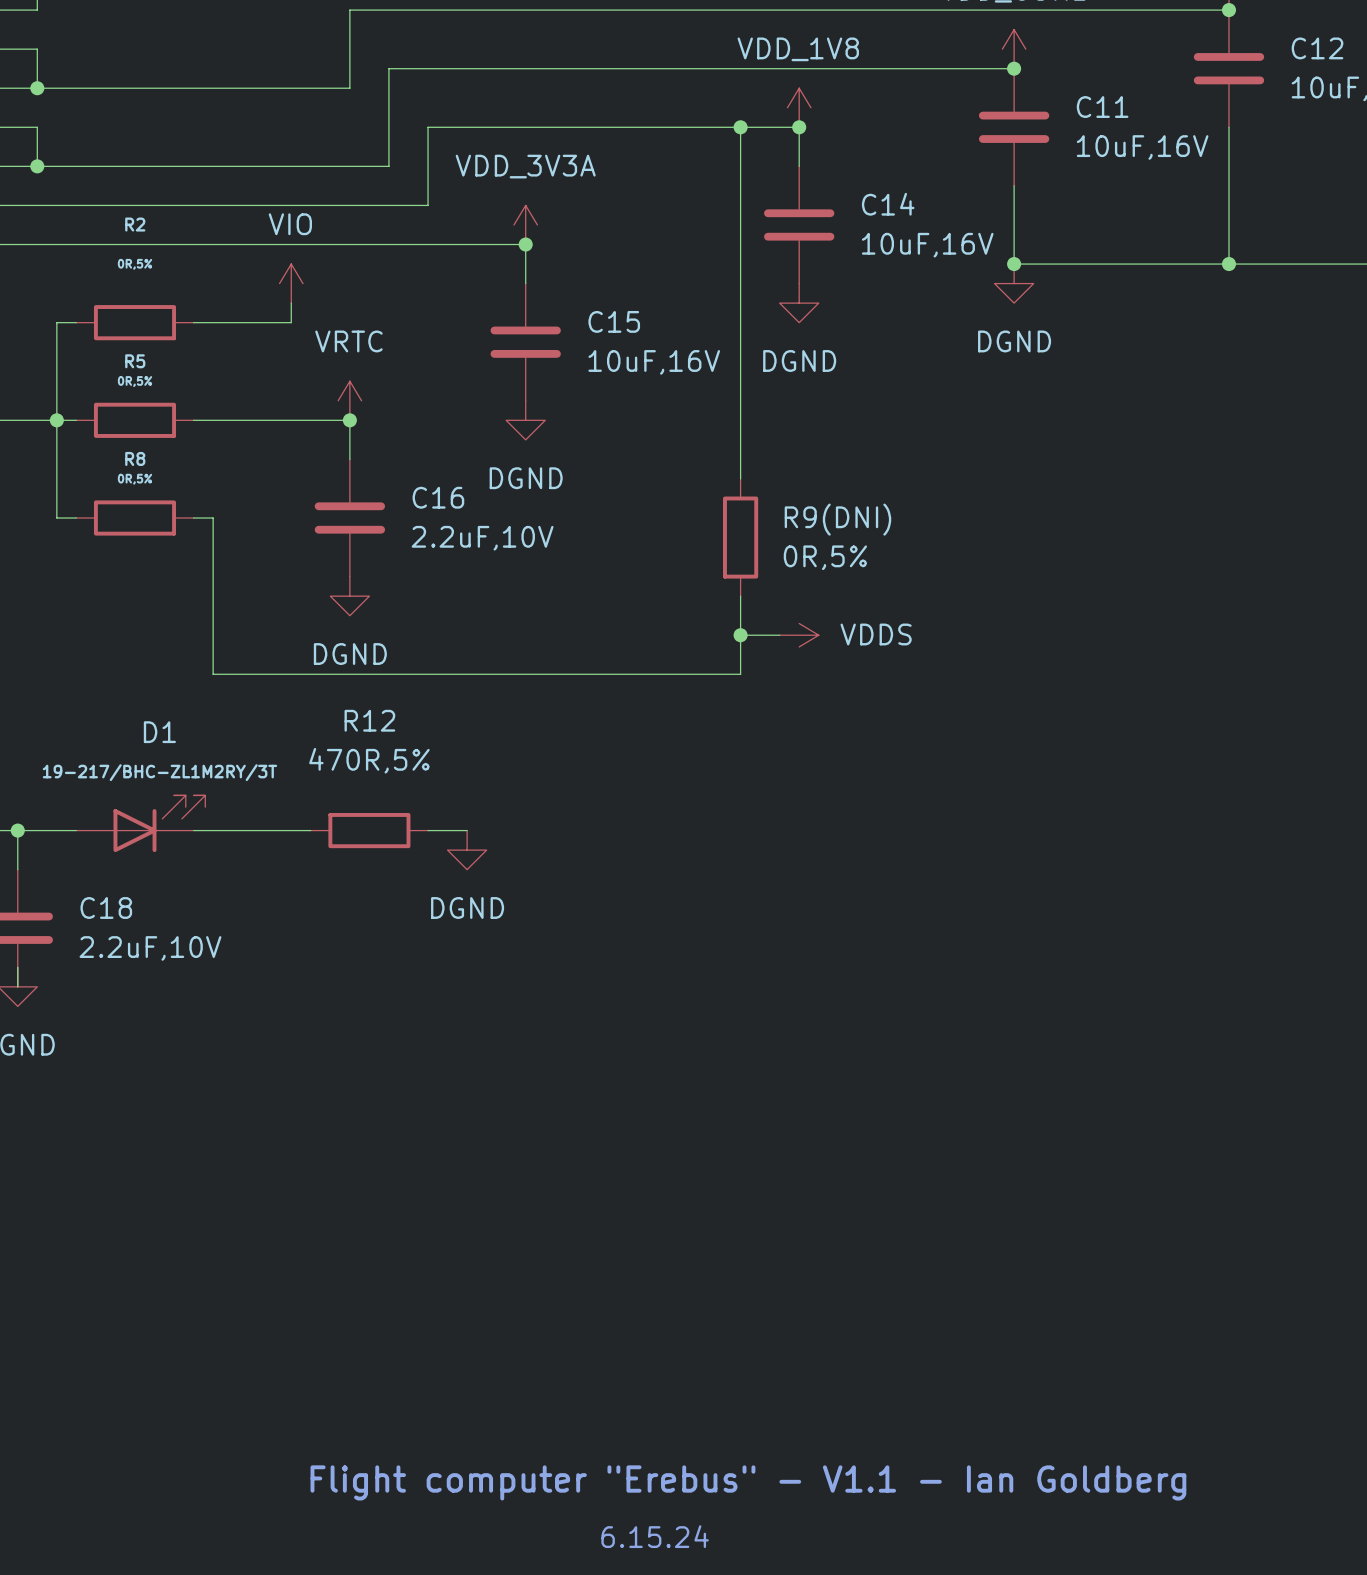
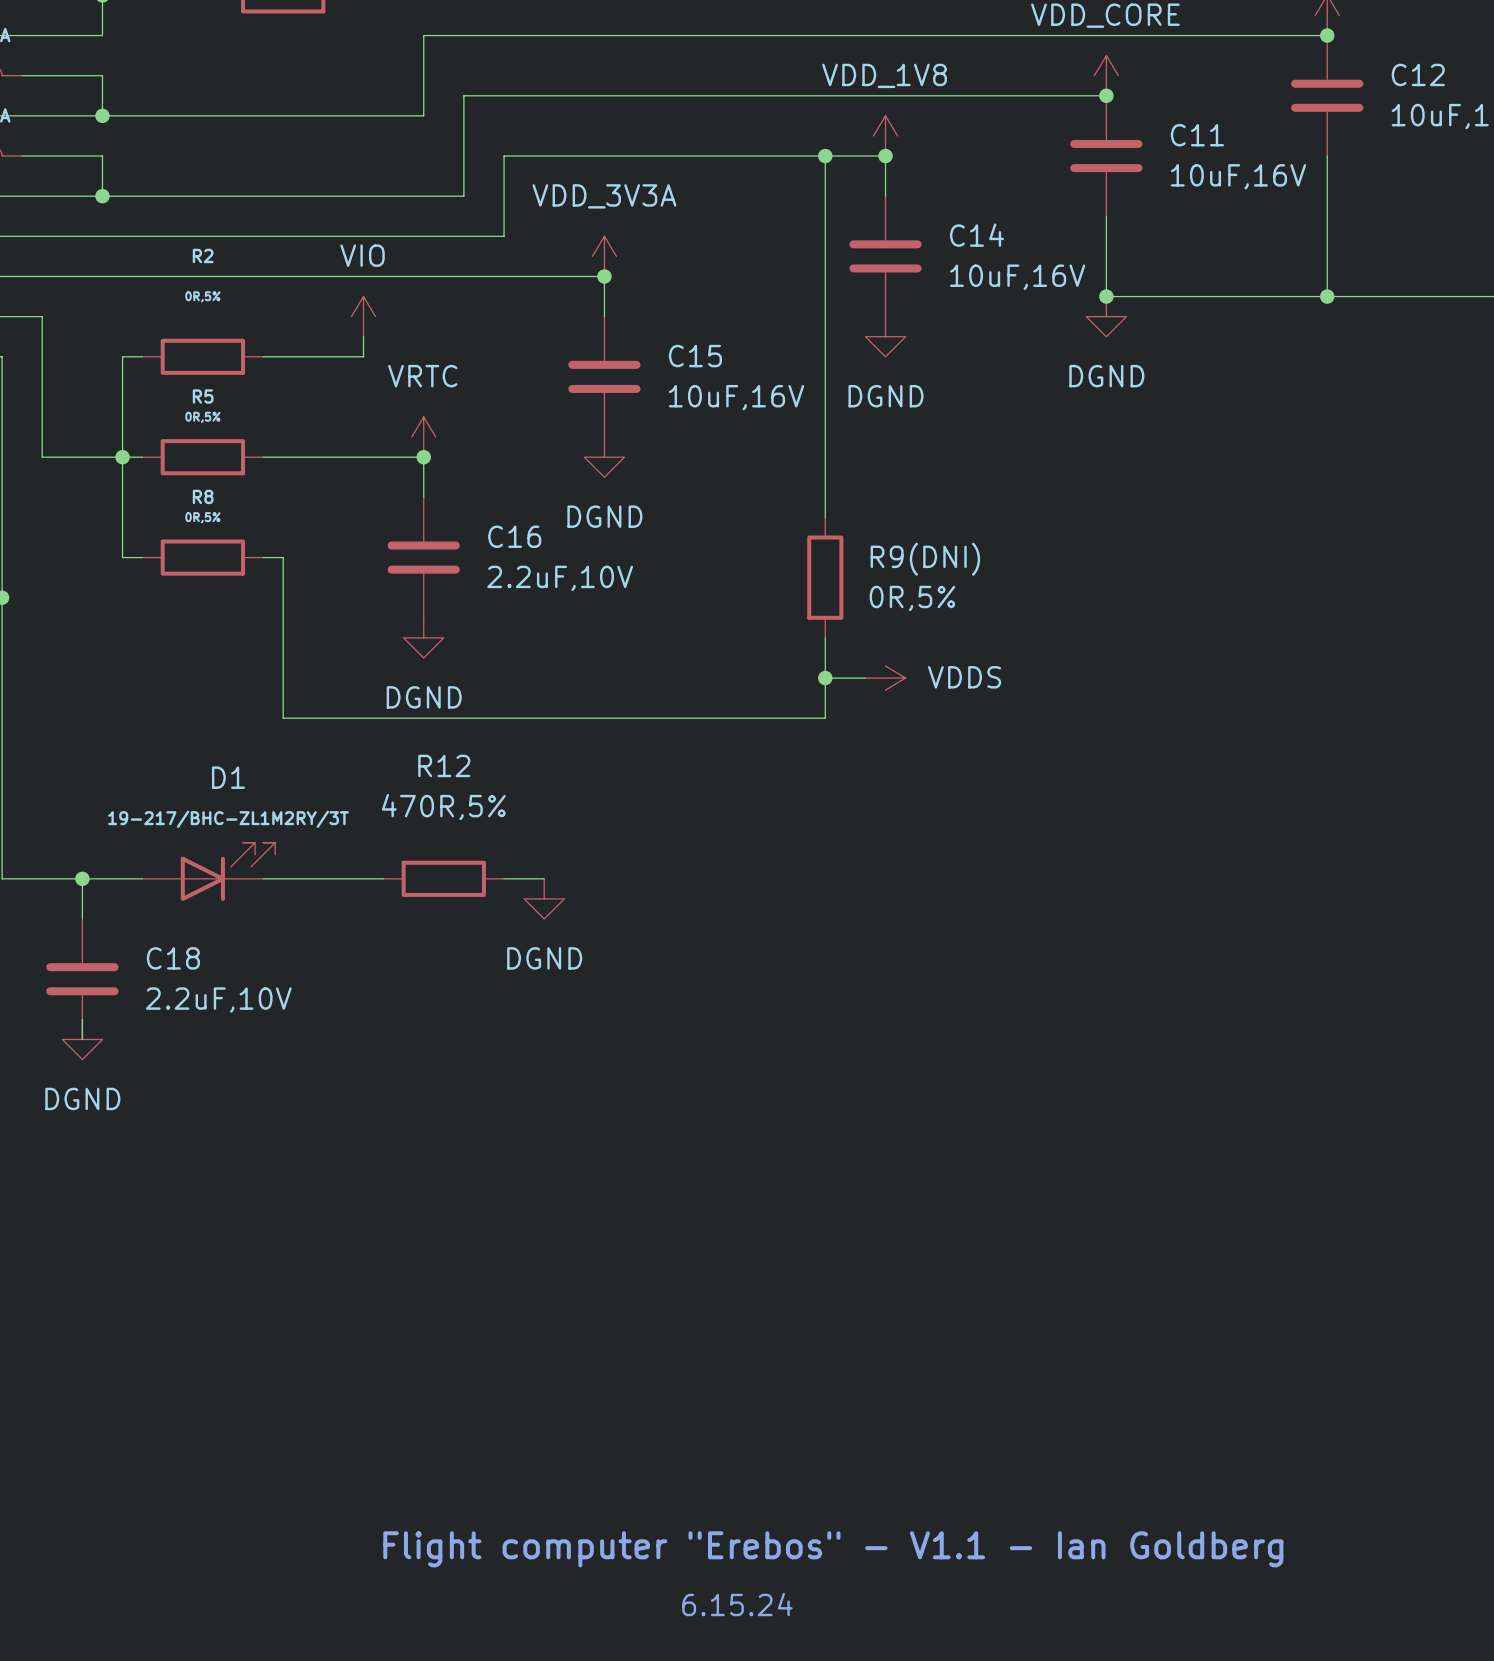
text: Flight computer "Erebus" - V1.1 - Ian Goldberg (748, 1482) -> Flight computer "Erebos" - V1.1 - Ian Goldberg (833, 1549)

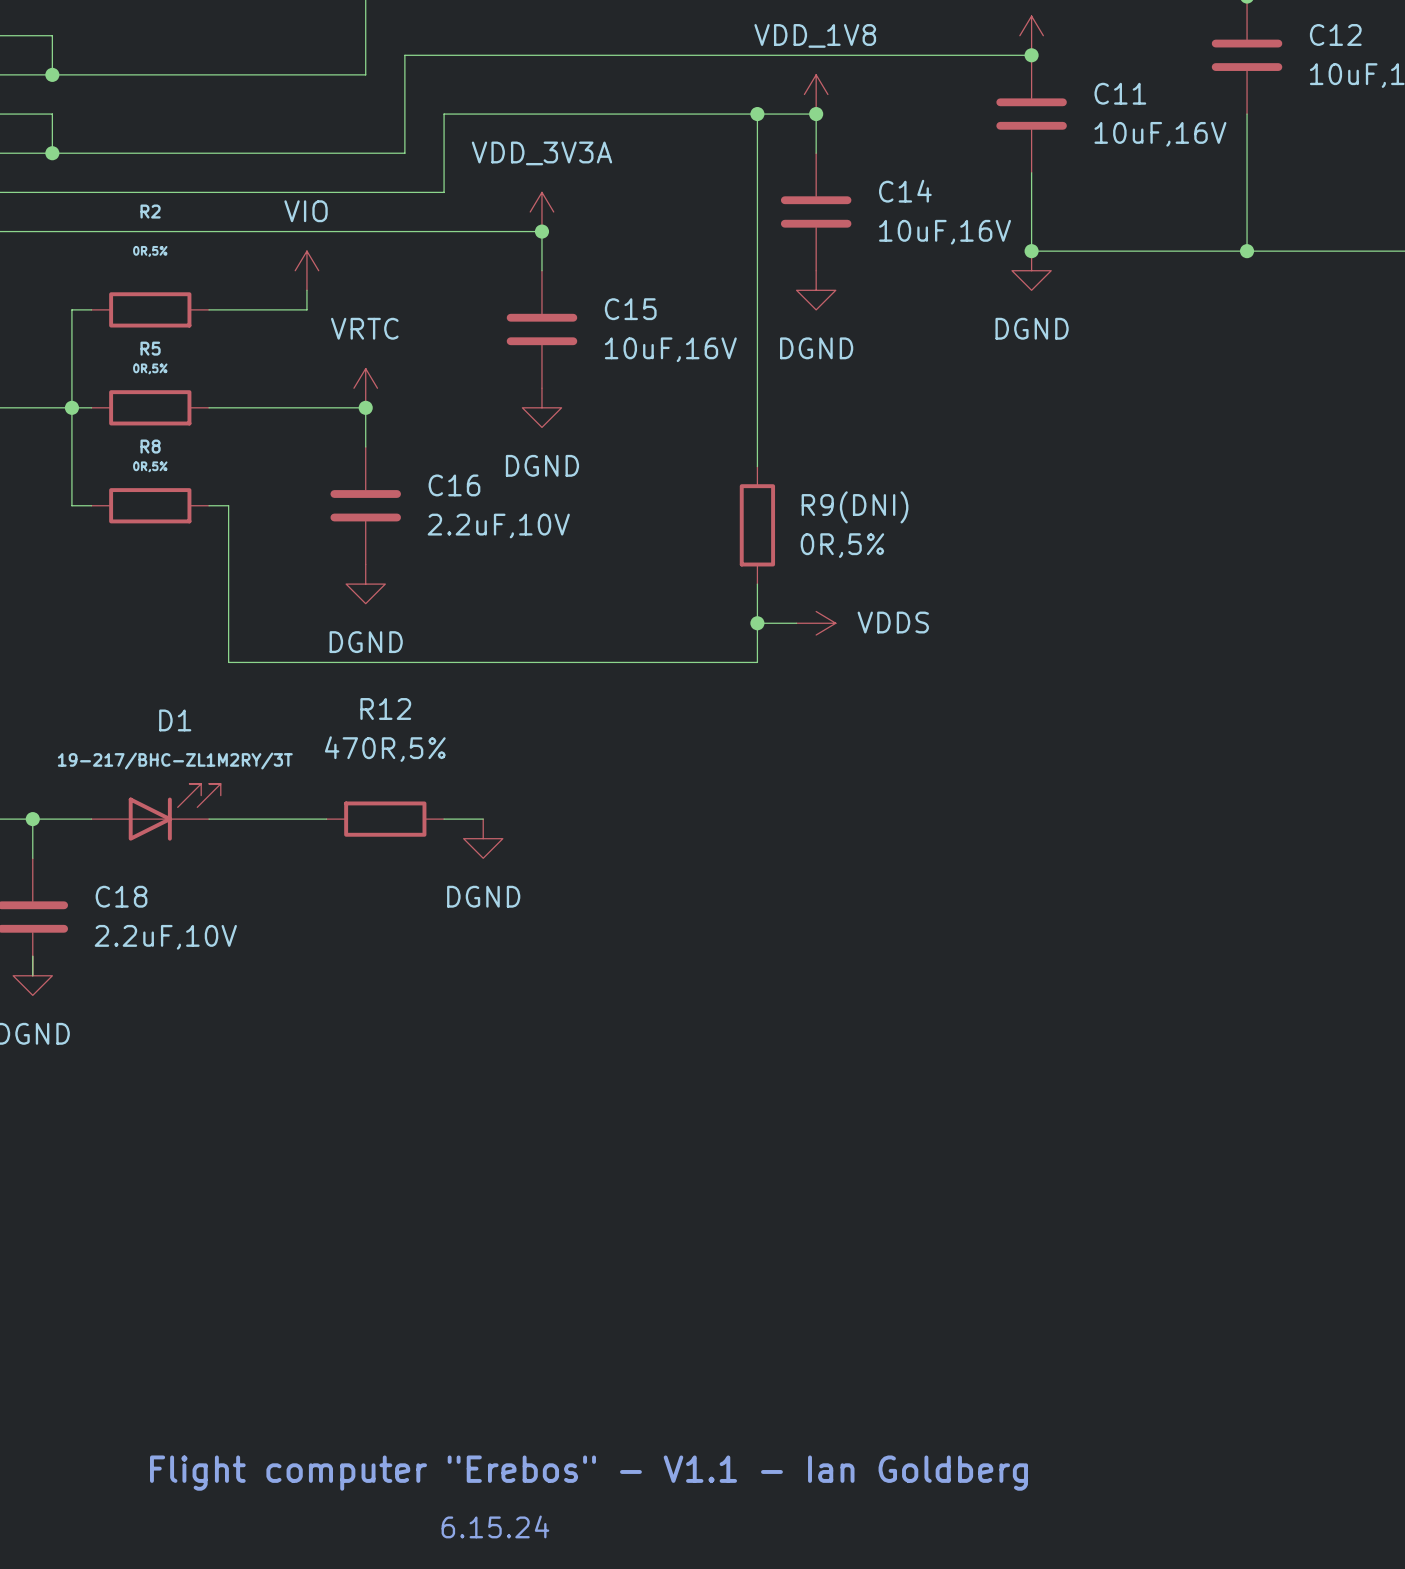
text position: Flight computer "Erebos" - V1.1 - Ian Goldberg (833, 1549) -> Flight computer "Erebos" - V1.1 - Ian Goldberg (588, 1473)
text position: 6.15.24 (737, 1604) -> 6.15.24 (495, 1526)

